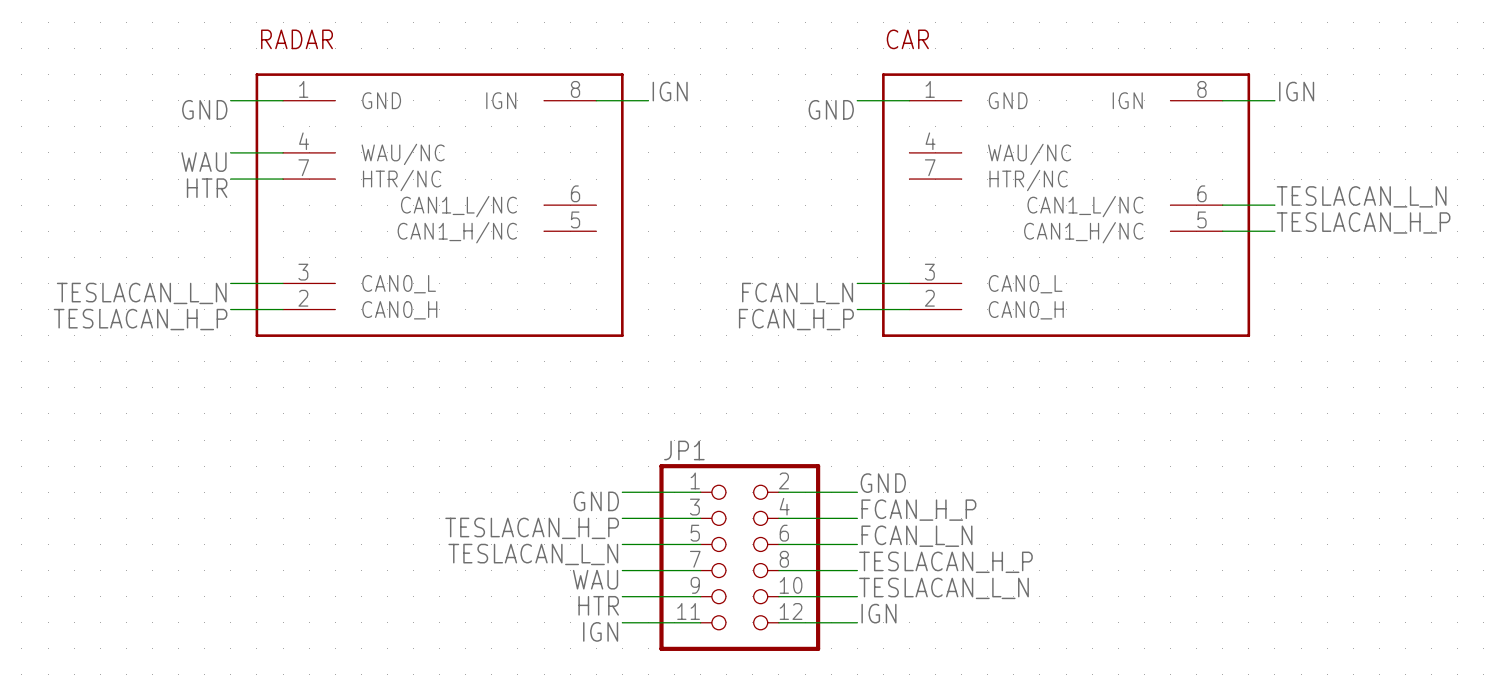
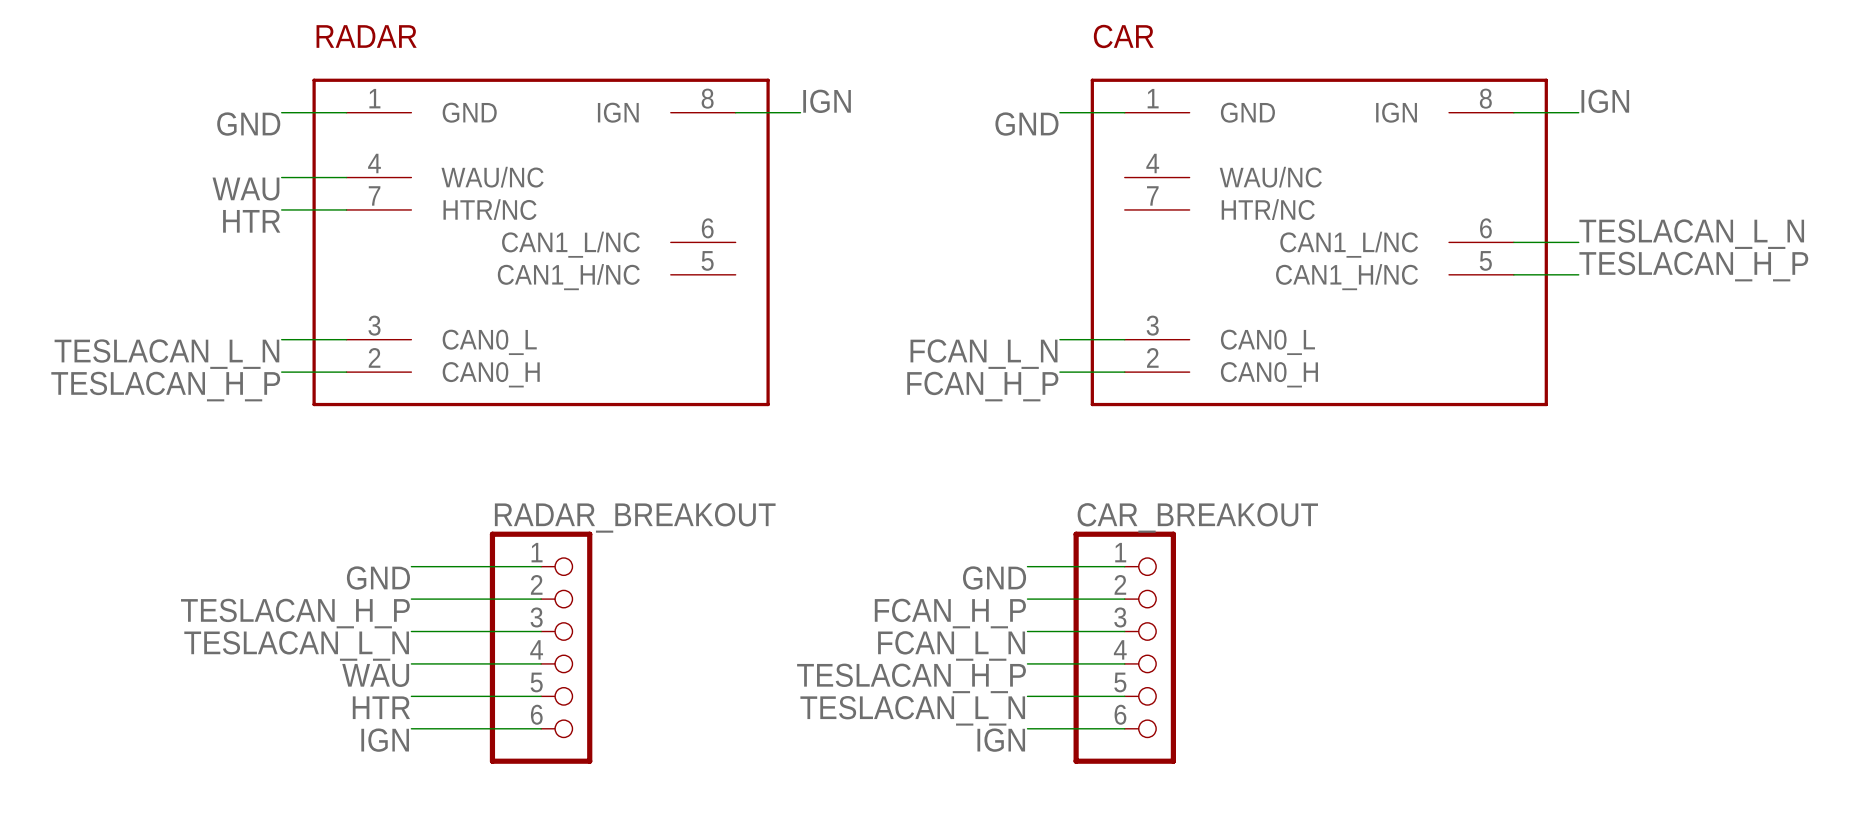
wire: none -> (411, 566) (541, 566)
label: none -> GND (378, 578)
label position: GND (883, 483) -> GND (994, 578)
wire: none -> (411, 599) (541, 599)
wire: (622, 492) (700, 492) -> none
wire: (778, 492) (831, 492) -> (1059, 599) (1124, 599)
label: GND (596, 501) -> none
label: none -> TESLACAN_H_P (295, 613)
label position: FCAN_H_P (918, 510) -> FCAN_H_P (950, 613)
wire: none -> (411, 631) (541, 631)
wire: (622, 518) (700, 518) -> none
wire: (778, 518) (831, 518) -> (1059, 631) (1124, 631)
label: none -> TESLACAN_L_N (296, 645)
label: TESLACAN_H_P (532, 528) -> none
RADAR_BREAKOUT: none -> (541, 647)
CAR_BREAKOUT: none -> (1124, 647)
label position: FCAN_L_N (916, 536) -> FCAN_L_N (951, 645)
wire: none -> (411, 663) (541, 663)
wire: (622, 544) (700, 544) -> none
wire: (778, 544) (831, 544) -> (1059, 663) (1124, 663)
label: none -> WAU (375, 675)
label: TESLACAN_L_N (533, 554) -> none
JP1: (739, 557) -> none
label position: TESLACAN_H_P (945, 562) -> TESLACAN_H_P (911, 678)
wire: none -> (411, 696) (541, 696)
wire: (622, 570) (700, 570) -> none
wire: (778, 570) (831, 570) -> (1059, 696) (1124, 696)
label: none -> HTR (381, 707)
label: WAU (595, 579) -> none
label position: TESLACAN_L_N (943, 588) -> TESLACAN_L_N (912, 710)
wire: none -> (411, 728) (541, 728)
wire: (622, 596) (700, 596) -> none
wire: (778, 596) (831, 596) -> (1059, 728) (1124, 728)
label: none -> IGN (385, 740)
label: HTR (598, 605) -> none
label position: IGN (878, 613) -> IGN (1001, 740)
wire: (622, 622) (700, 622) -> none
wire: (778, 622) (857, 622) -> (1027, 566) (1124, 566)
label: IGN (600, 631) -> none

